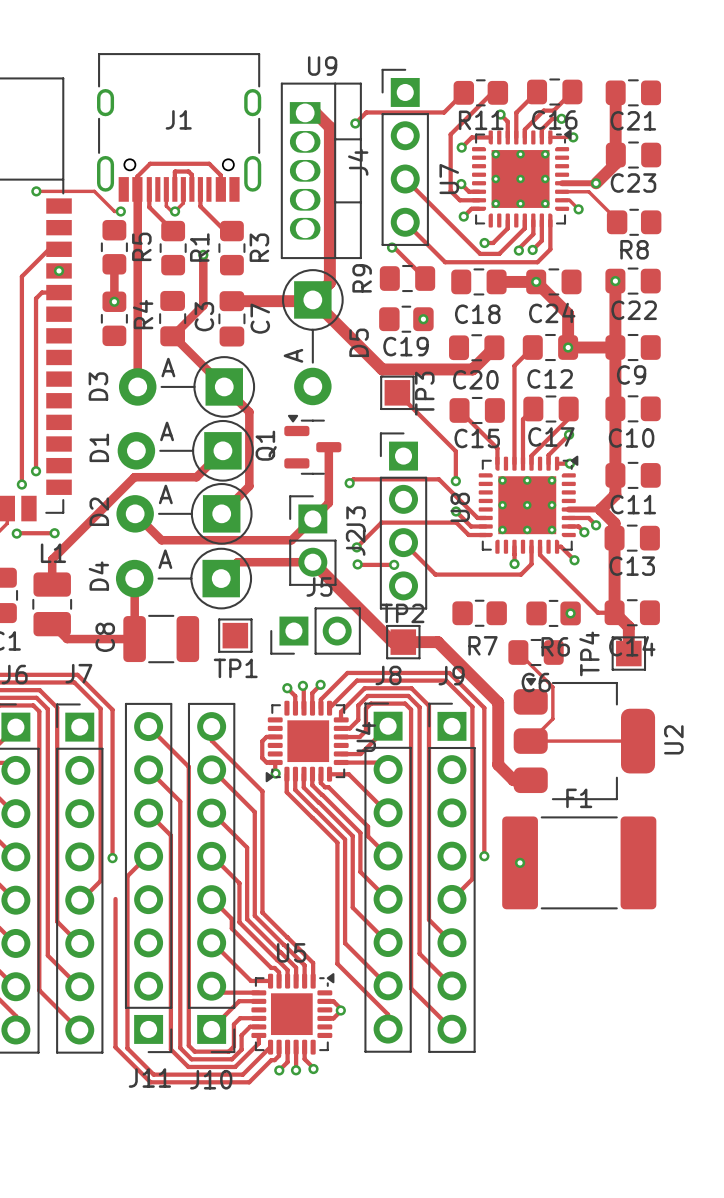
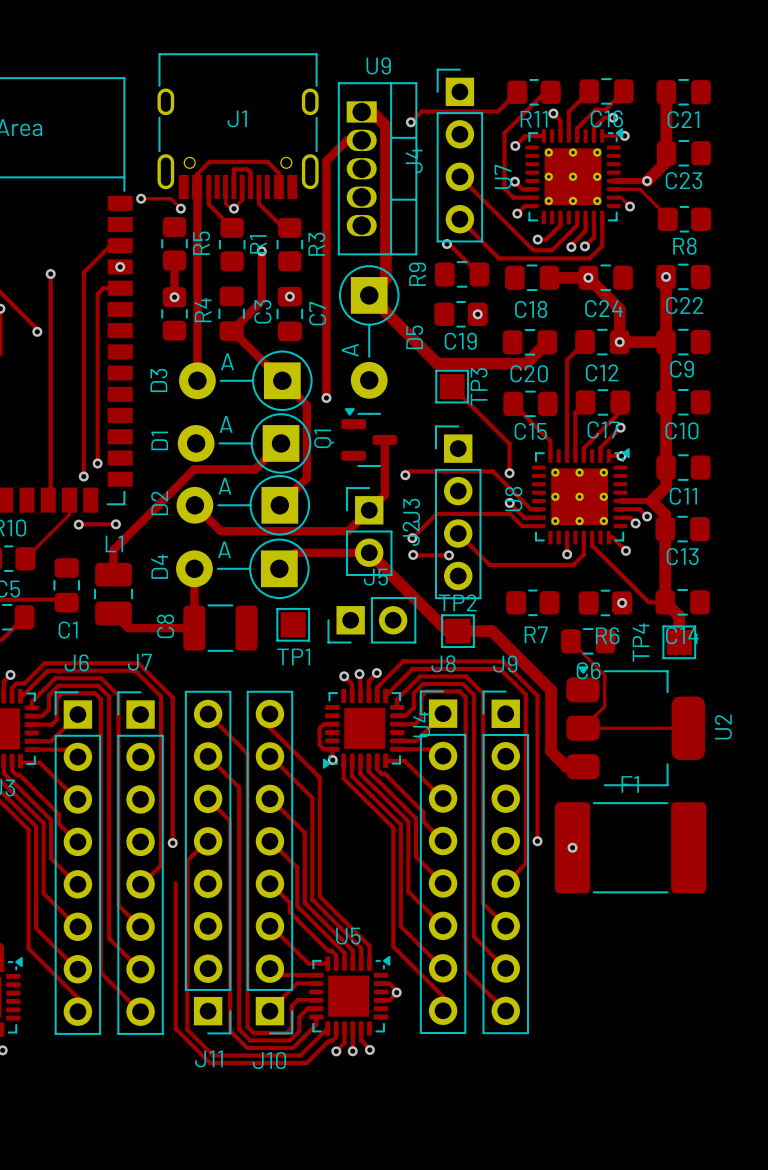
track: none -> (361, 140) (347, 140) (326, 161) (326, 397)
track: (36, 191) (94, 191) (114, 211) (120, 211) -> (141, 198) (170, 198) (180, 208)
via position: (36, 191) -> (141, 198)
track: (231, 301) (311, 301) -> none
via: none -> (289, 296)
via: none -> (326, 397)

